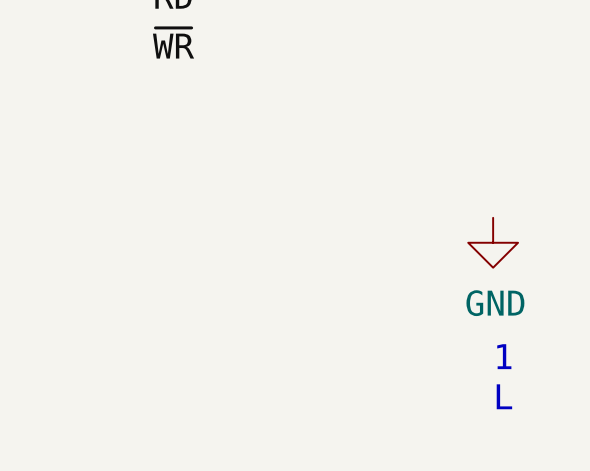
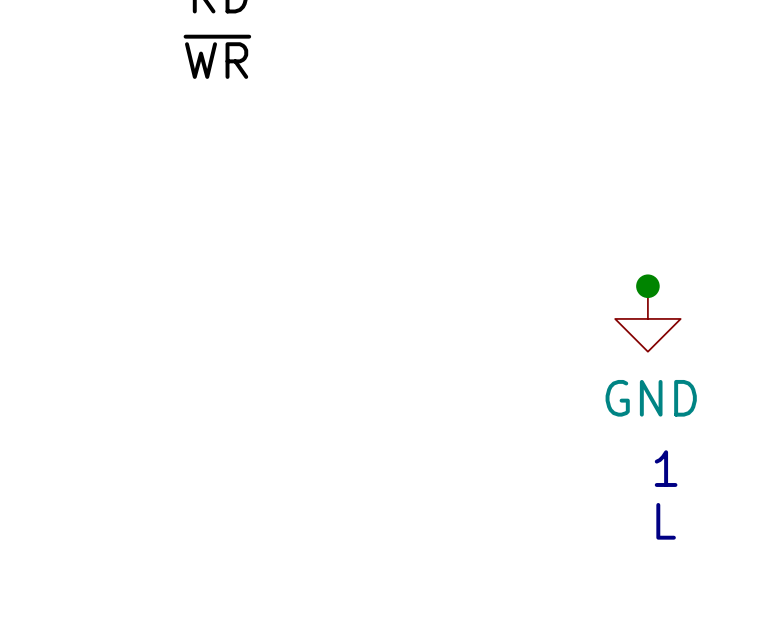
junction: none -> (647, 286)

